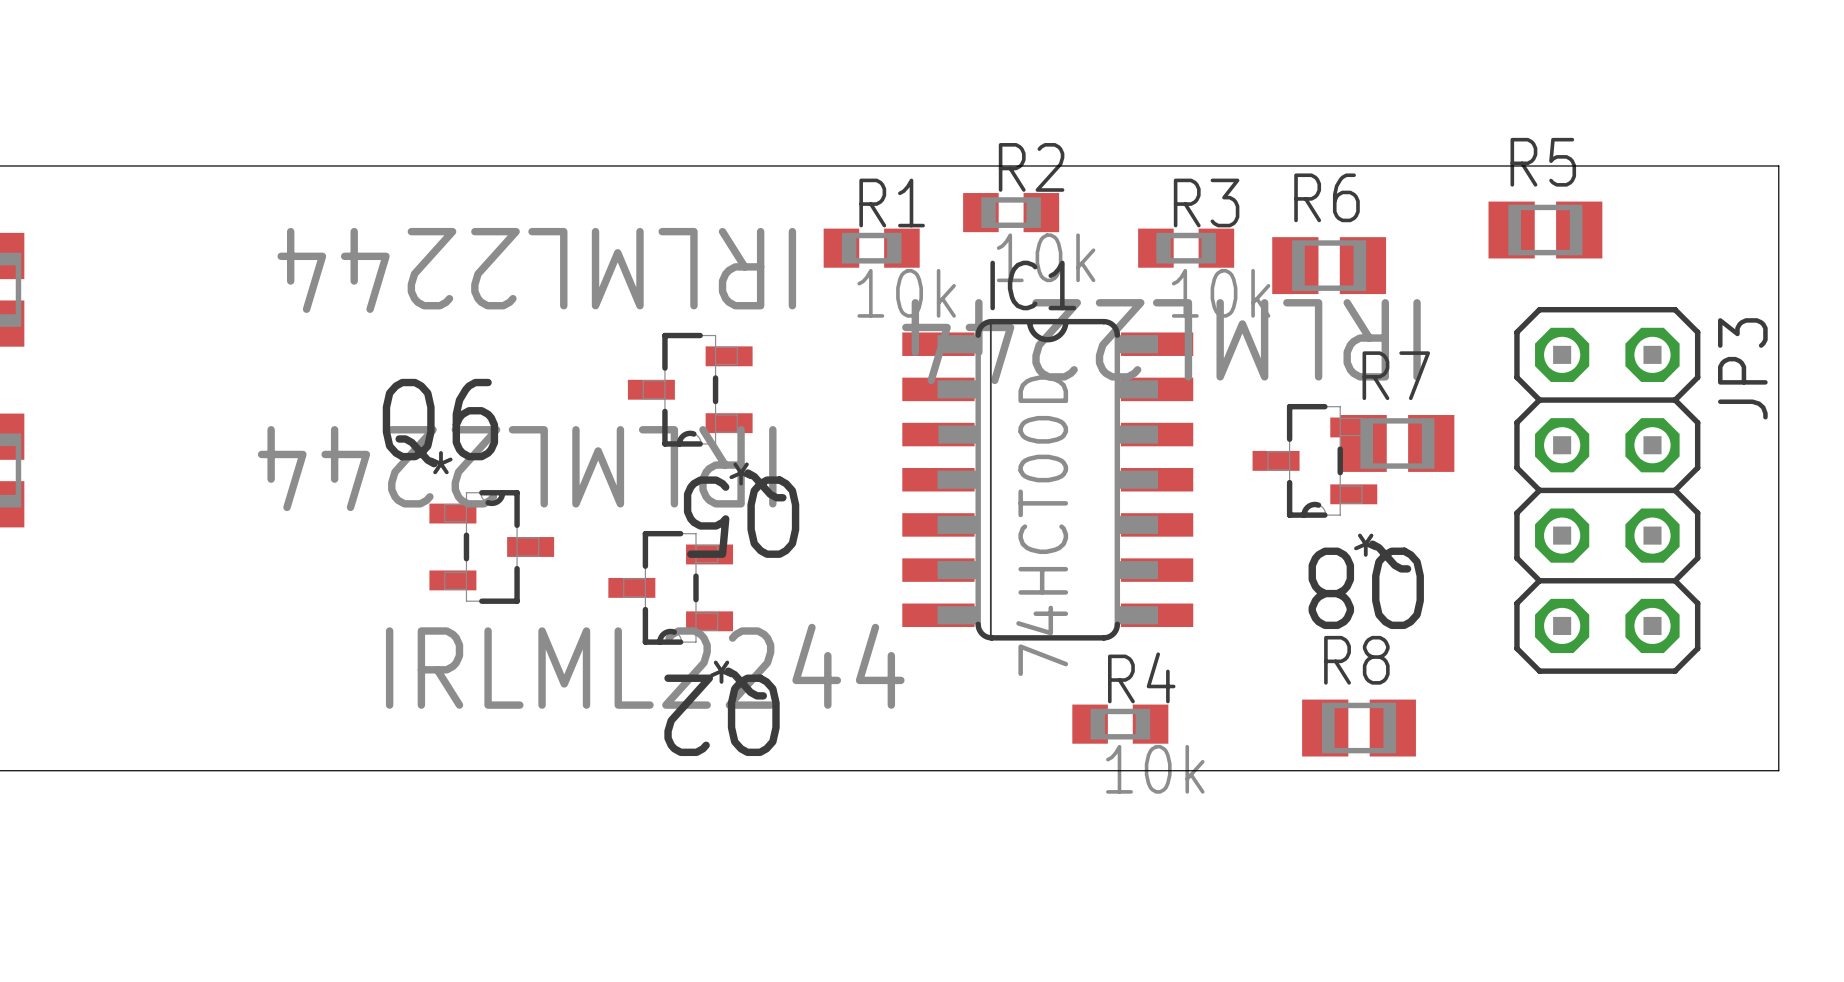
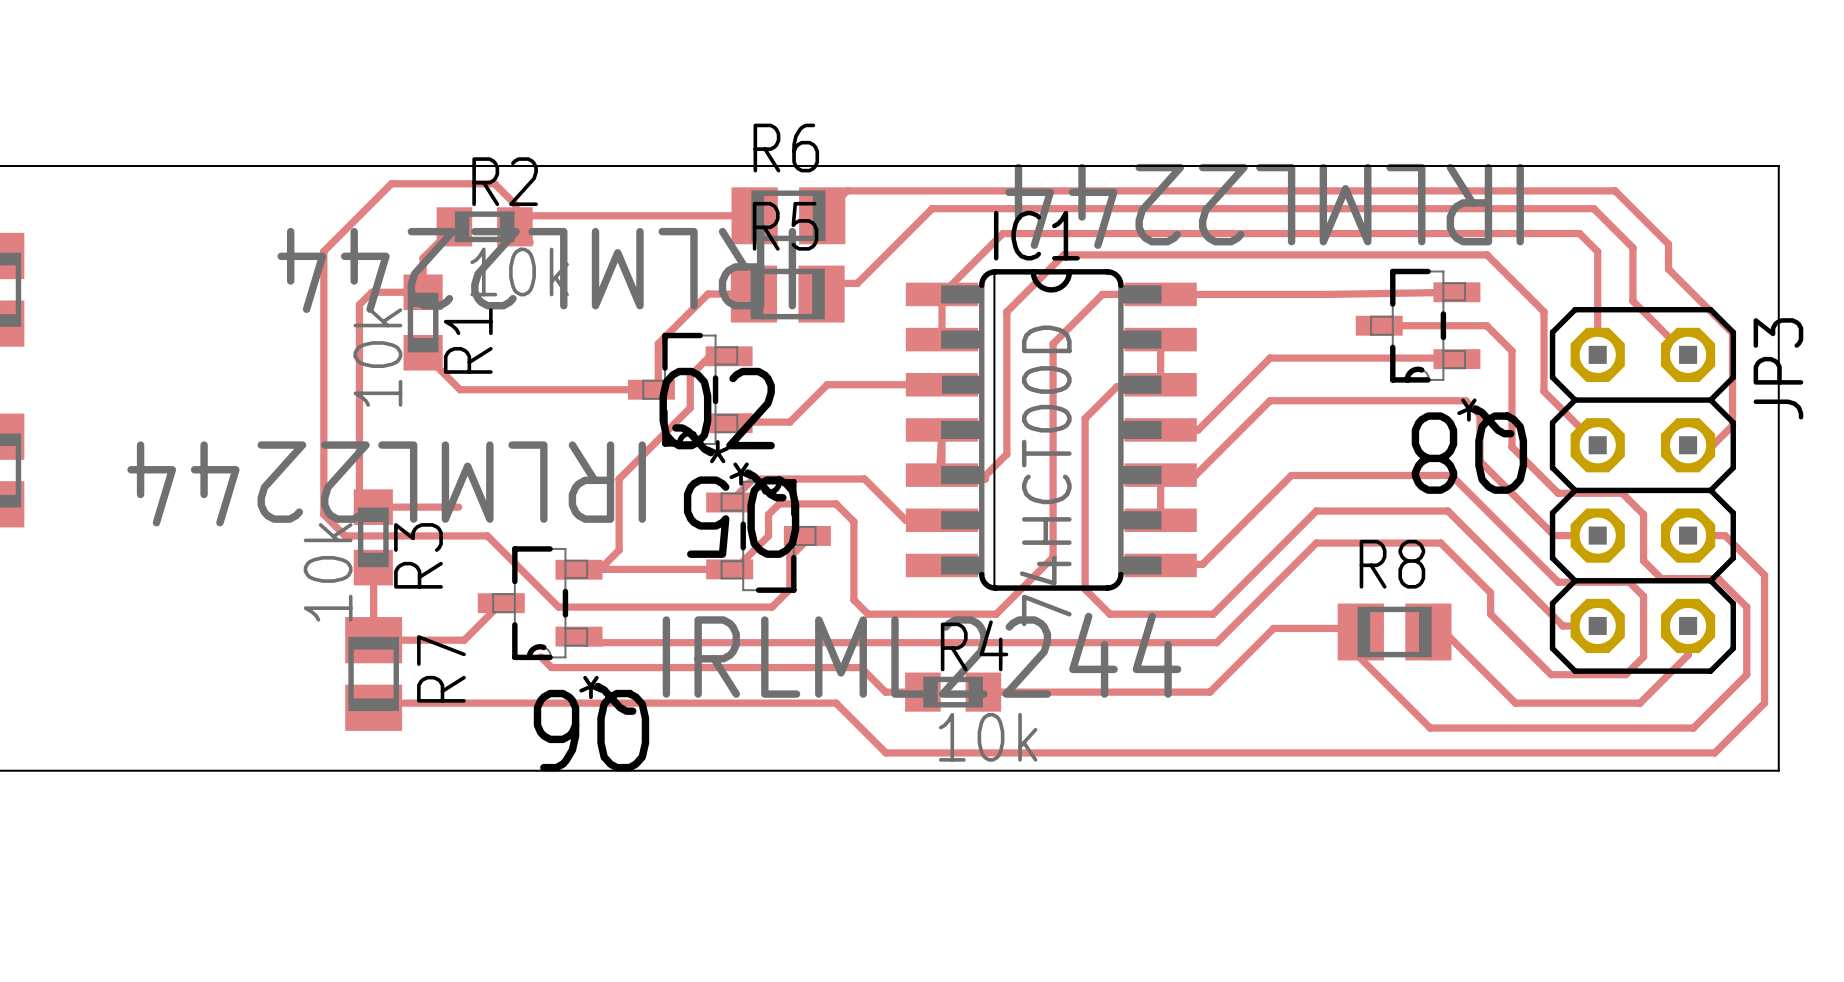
R2 position: (1011, 212) -> (484, 226)
top track: none -> (754, 215) (525, 215) (514, 226) (530, 242)
top track: none -> (822, 215) (847, 190) (1615, 190) (1668, 244) (1668, 269) (1732, 333) (1732, 425) (1712, 445) (1688, 445)
top track: none -> (515, 225) (515, 205) (494, 183) (391, 183) (323, 251) (323, 514) (345, 535) (487, 535) (558, 607) (772, 607) (789, 589) (789, 557) (807, 539) (807, 535)
top track: none -> (454, 226) (423, 258) (423, 292) (371, 292) (359, 304) (359, 493) (373, 507) (458, 507)
R5 position: (1545, 230) -> (787, 294)
R1 rotation: 0° (871, 248) -> 90° clockwise (423, 322)
R1 position: (871, 248) -> (423, 322)
R3 rotation: 0° (1186, 248) -> 90° clockwise (373, 537)
R3 position: (1186, 248) -> (373, 537)
R6 position: (1329, 265) -> (788, 215)
top track: none -> (1456, 292) (1102, 294) (1053, 343) (1053, 557) (996, 614) (868, 614) (853, 599) (853, 521) (836, 503) (779, 503) (768, 514) (768, 535) (735, 569) (579, 569)
top track: none -> (753, 294) (708, 294) (658, 343) (658, 382) (651, 389) (460, 389) (423, 352)
top track: none -> (821, 294) (832, 283) (857, 283) (932, 208) (1593, 208) (1632, 247) (1632, 301) (1688, 354)
top track: none -> (1379, 325) (1486, 325) (1511, 350) (1511, 447) (1558, 493) (1622, 493) (1643, 514) (1643, 560) (1661, 578) (1718, 578) (1746, 607) (1746, 674) (1693, 728) (1430, 728) (1359, 656) (1359, 633) (1360, 631)
top track: none -> (941, 339) (941, 294) (1002, 233) (1579, 233) (1597, 251) (1597, 354)
top track: none -> (1160, 339) (1160, 384) (1158, 386) (1117, 386) (1085, 418) (1085, 589) (1110, 614) (1213, 614) (1316, 511) (1447, 511) (1562, 625) (1597, 625)
top track: none -> (729, 356) (709, 356) (690, 375) (690, 407) (619, 479) (619, 550) (599, 569)
top track: none -> (1456, 359) (1270, 358) (1198, 429) (1160, 429)
top track: none -> (941, 384) (827, 384) (789, 422) (729, 423)
R7 rotation: 0° (1397, 443) -> 90° clockwise (373, 673)
R7 position: (1397, 443) -> (373, 673)
top track: none -> (1597, 445) (1544, 391) (1544, 311) (1487, 254) (1063, 254) (1006, 311) (1006, 454) (985, 475) (985, 479) (939, 479) (941, 429) (941, 475)
Q8 position: (1314, 460) -> (1418, 325)
top track: none -> (1160, 475) (1160, 520)
top track: none -> (1161, 475) (1195, 475) (1270, 400) (1465, 400) (1479, 415) (1479, 461) (1554, 535) (1597, 535)
IC1 position: (1047, 479) -> (1051, 429)
JP3 position: (1607, 490) -> (1642, 490)
top track: none -> (729, 502) (753, 479) (864, 479) (905, 520) (941, 520)
top track: none -> (1688, 535) (1725, 535) (1764, 575) (1764, 703) (1714, 752) (885, 752) (836, 703) (378, 703) (373, 707)
Q6 rotation: 0° (491, 546) -> 180° (540, 603)
top track: none -> (1160, 565) (1202, 564) (1291, 475) (1451, 475) (1558, 582) (1629, 582) (1643, 596) (1643, 656) (1625, 674) (1551, 674) (1490, 614) (1490, 592) (1440, 543) (1316, 543) (1216, 642) (585, 642) (578, 636)
top track: none -> (373, 567) (373, 640) (464, 640) (501, 603)
Q2 rotation: 0° (670, 587) -> 180° (768, 535)
Q2 position: (670, 587) -> (768, 535)
top track: none -> (1688, 625) (1688, 655) (1640, 703) (1515, 703) (1447, 635) (1431, 635) (1428, 631)
top track: none -> (1360, 631) (1357, 628) (1273, 628) (1209, 692) (983, 692)
top track: none -> (540, 656) (551, 667) (861, 667) (885, 692) (922, 692)
R4 position: (1120, 724) -> (953, 692)
R8 position: (1359, 728) -> (1394, 631)

